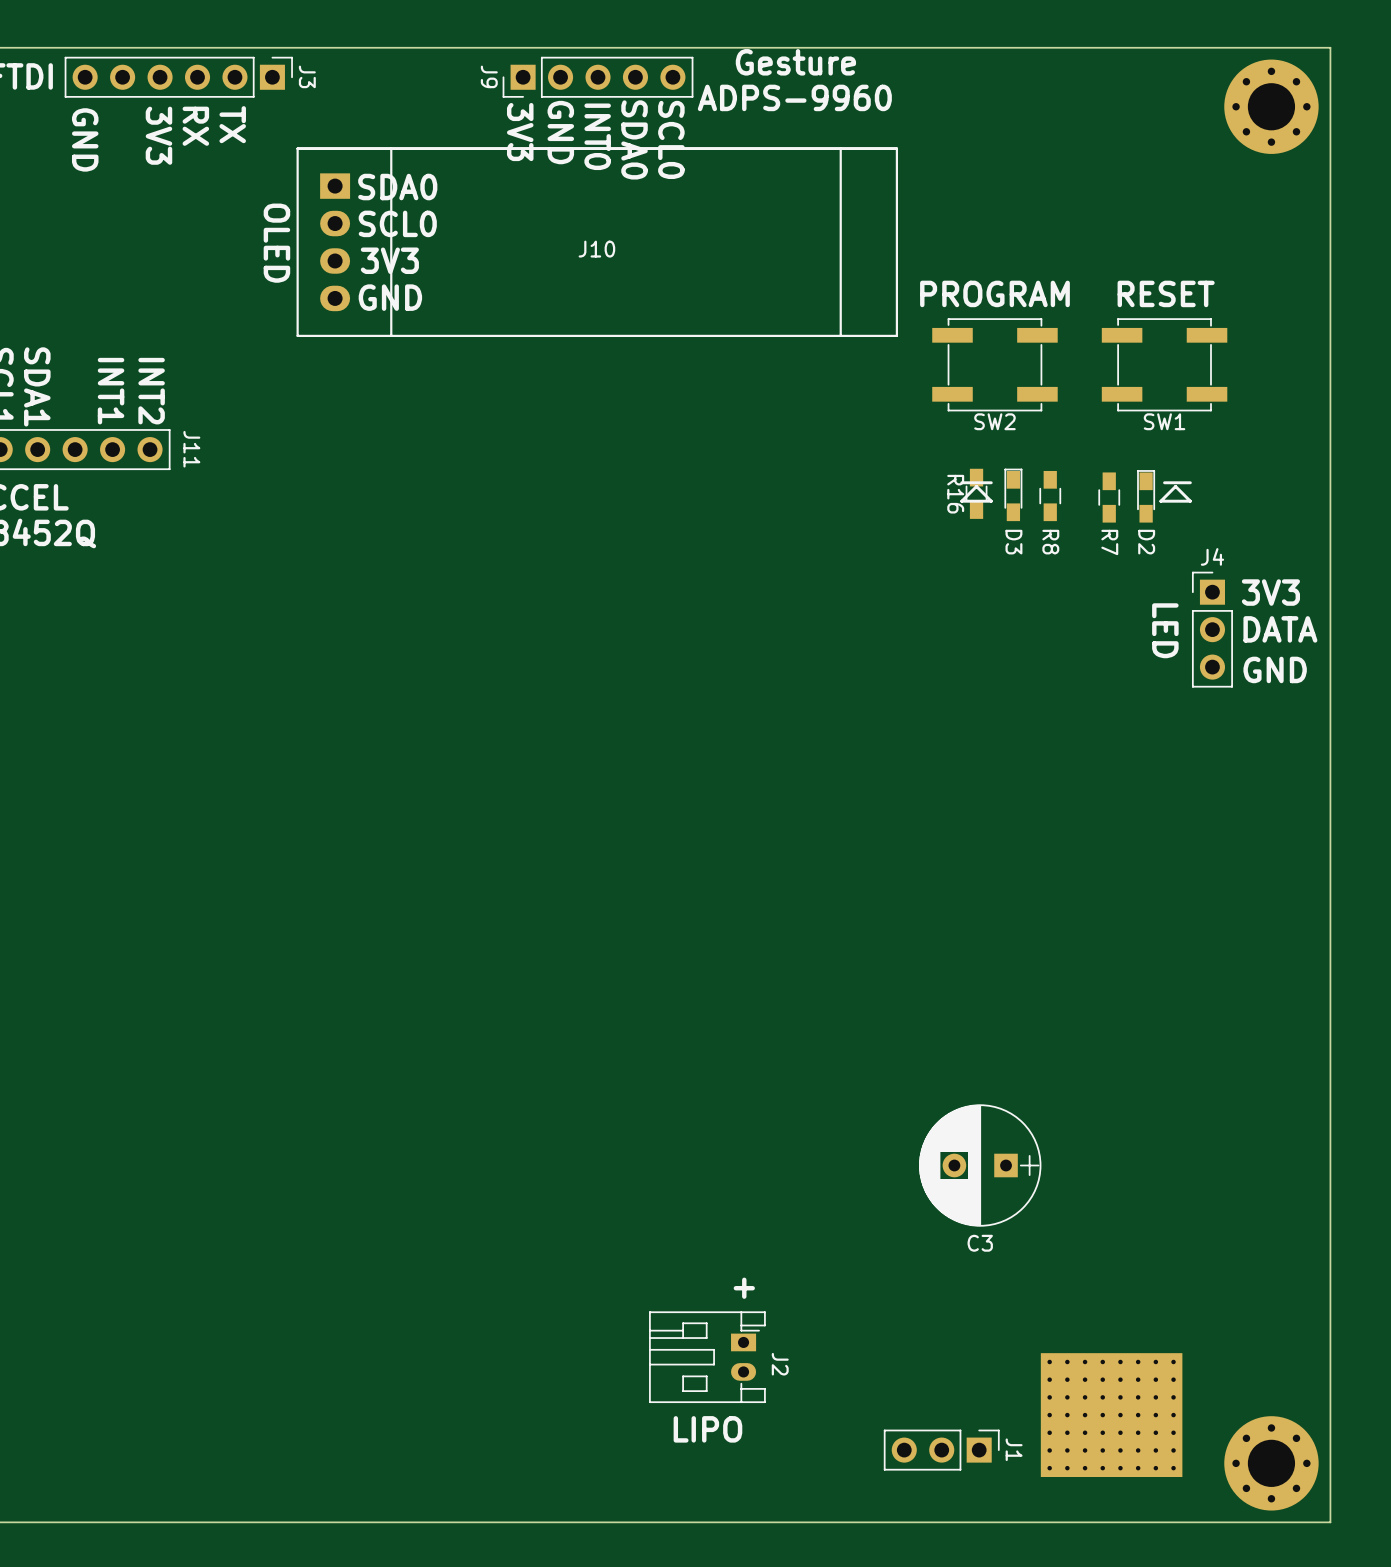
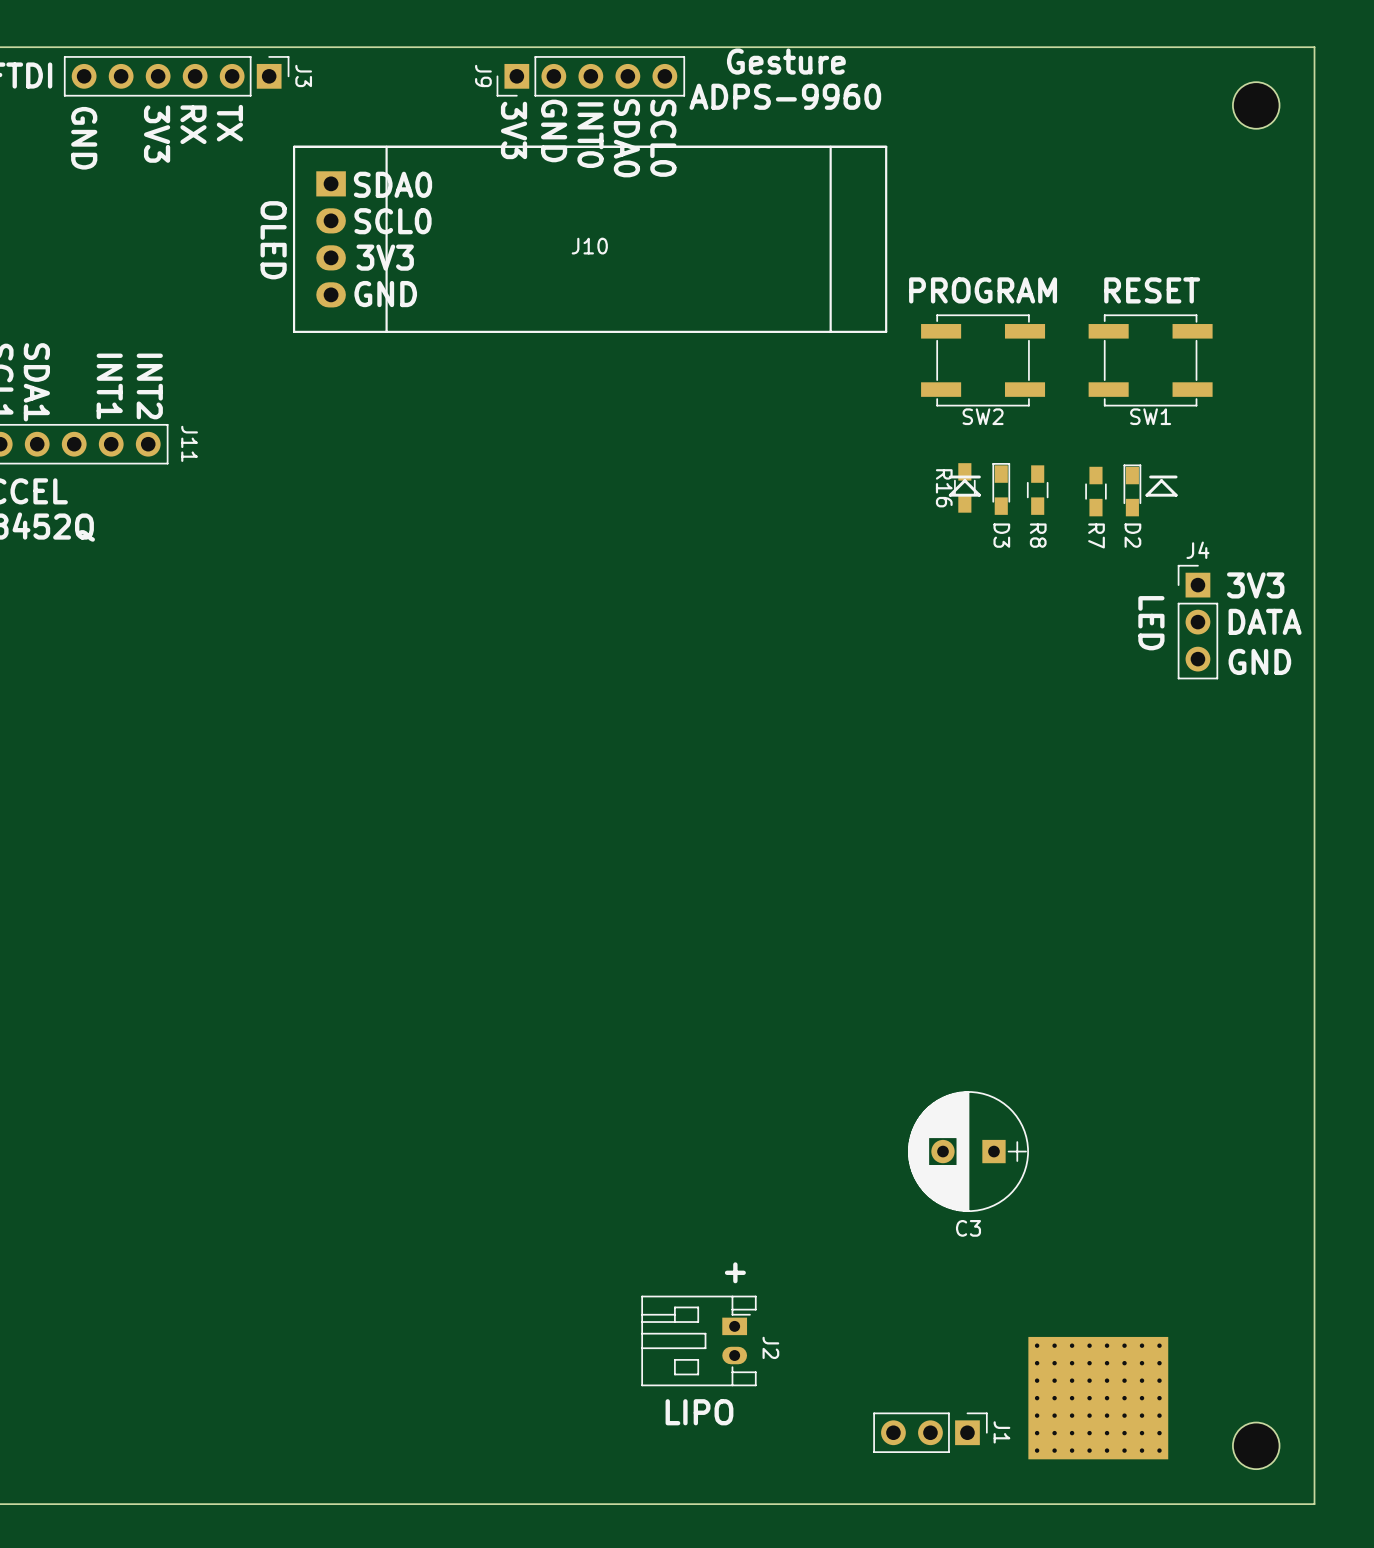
part footprint: [1224, 59, 1319, 154] -> [1232, 82, 1280, 129]
part footprint: [1224, 1416, 1319, 1511] -> [1232, 1422, 1280, 1470]

